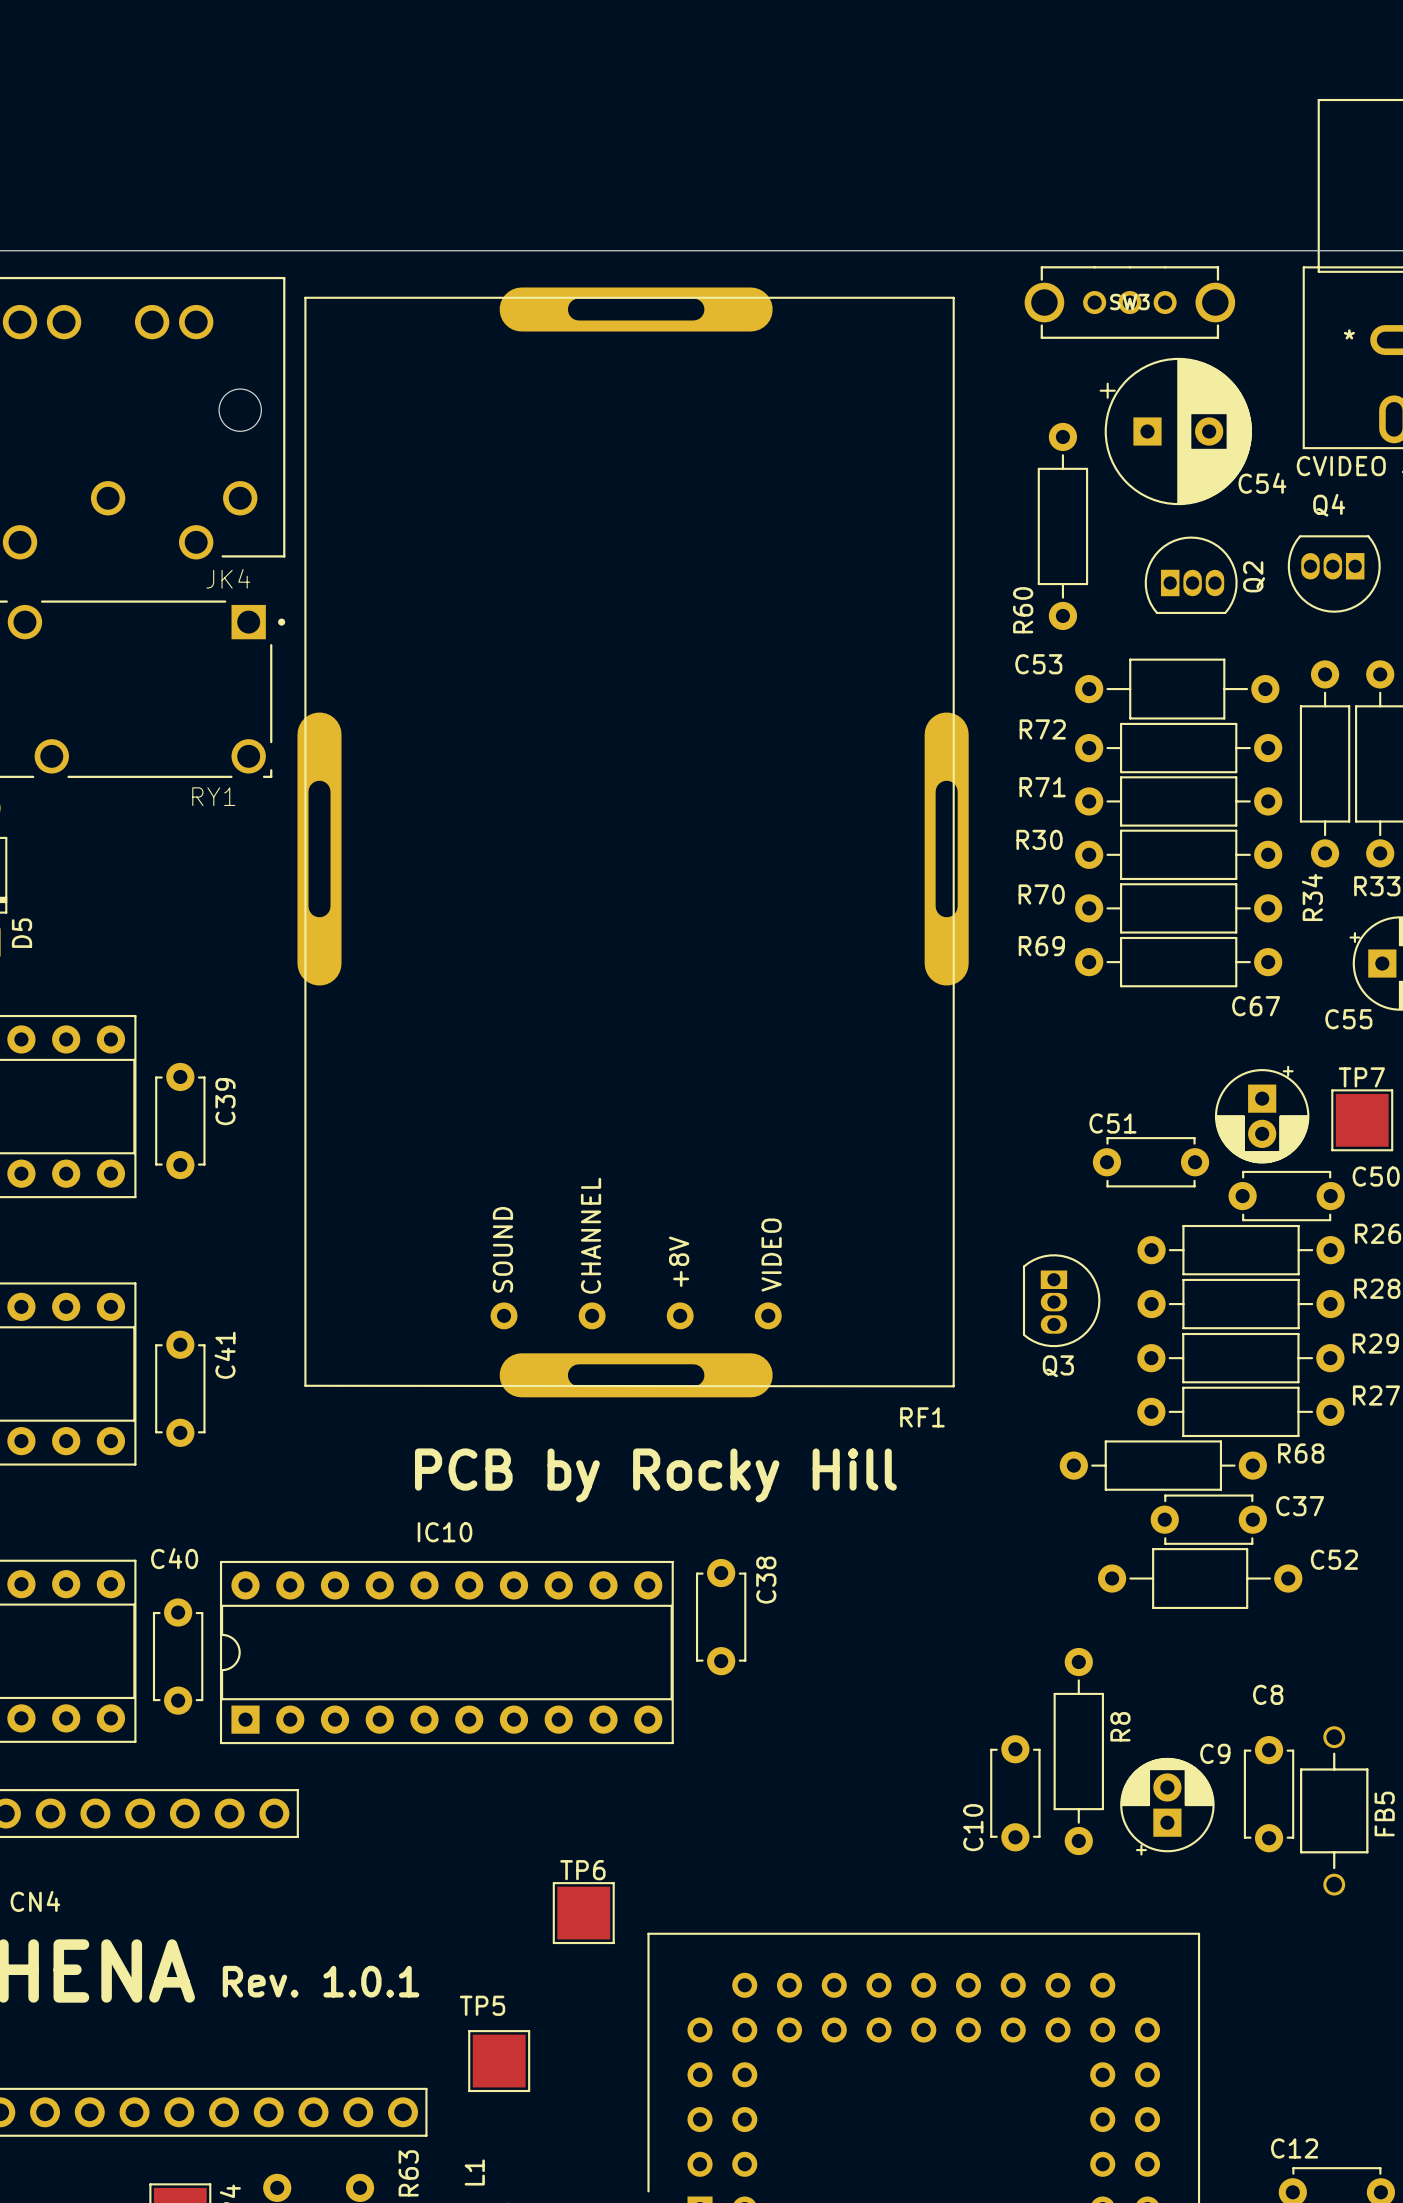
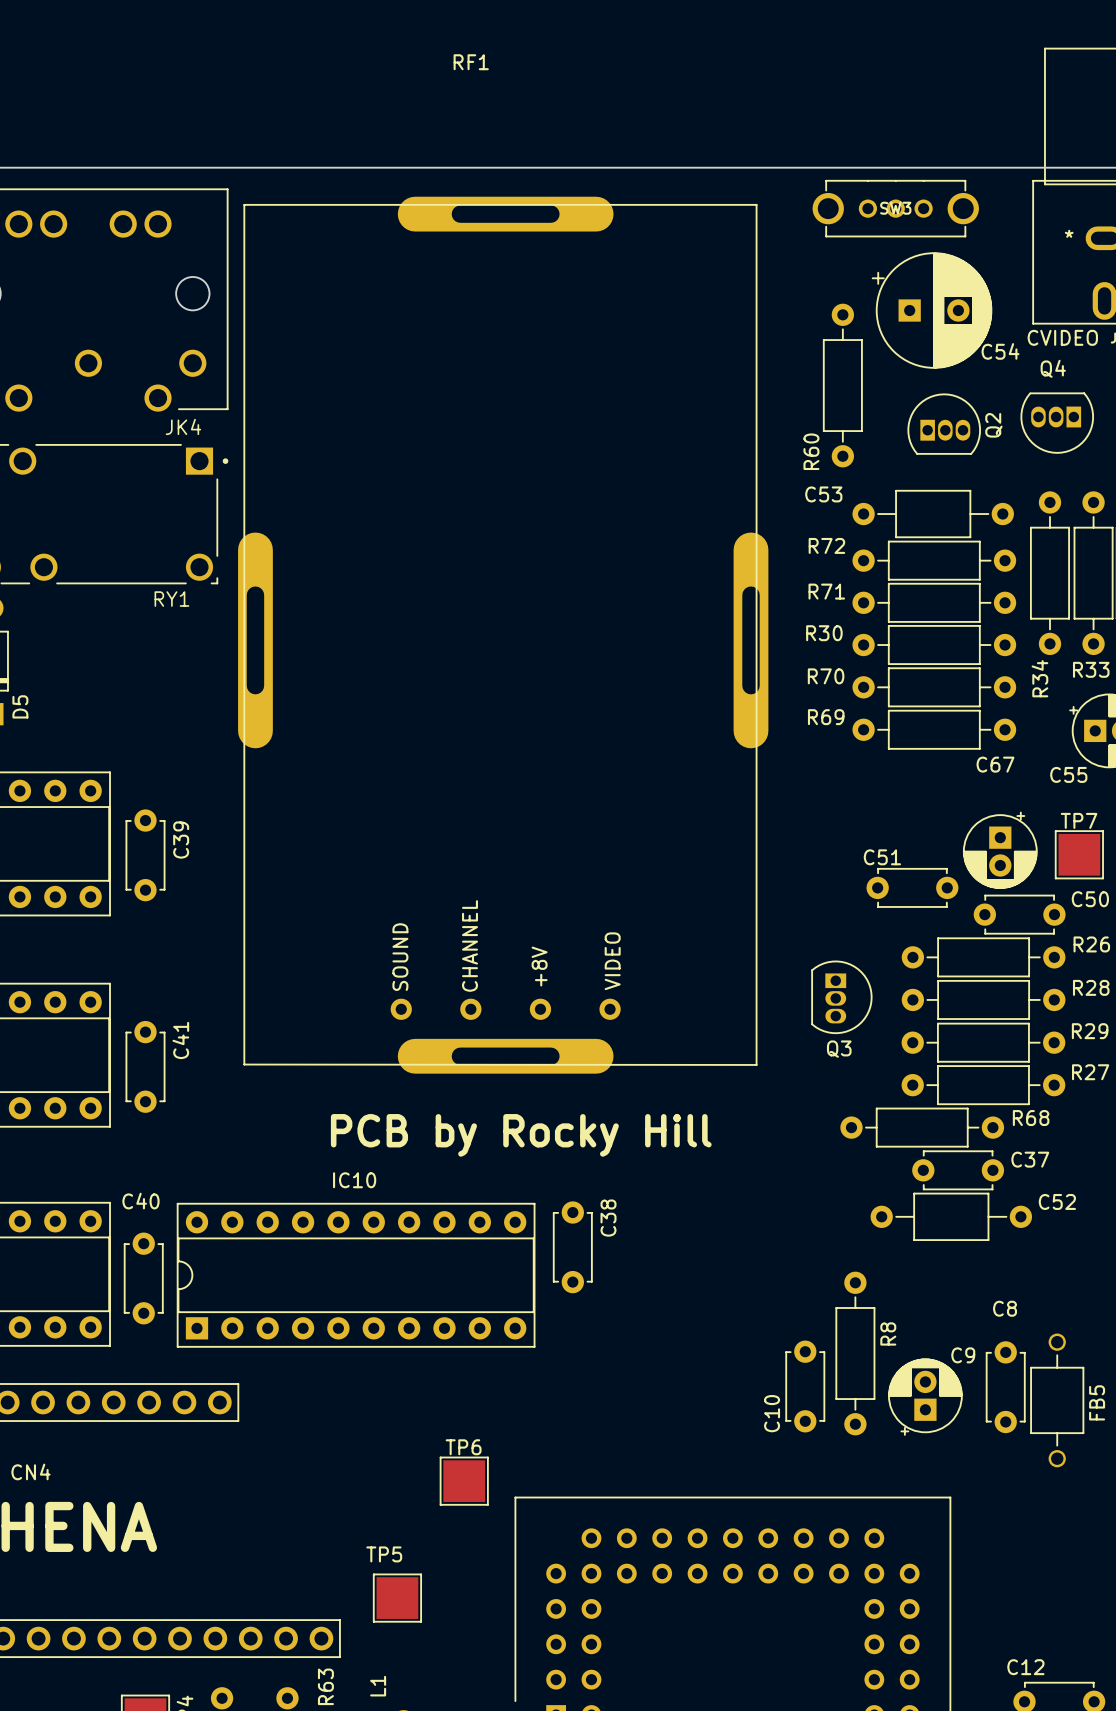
RF1 name position: RF1 (922, 1417) -> RF1 (471, 62)
text: Rev. 1.0.1 (321, 1981) -> none

